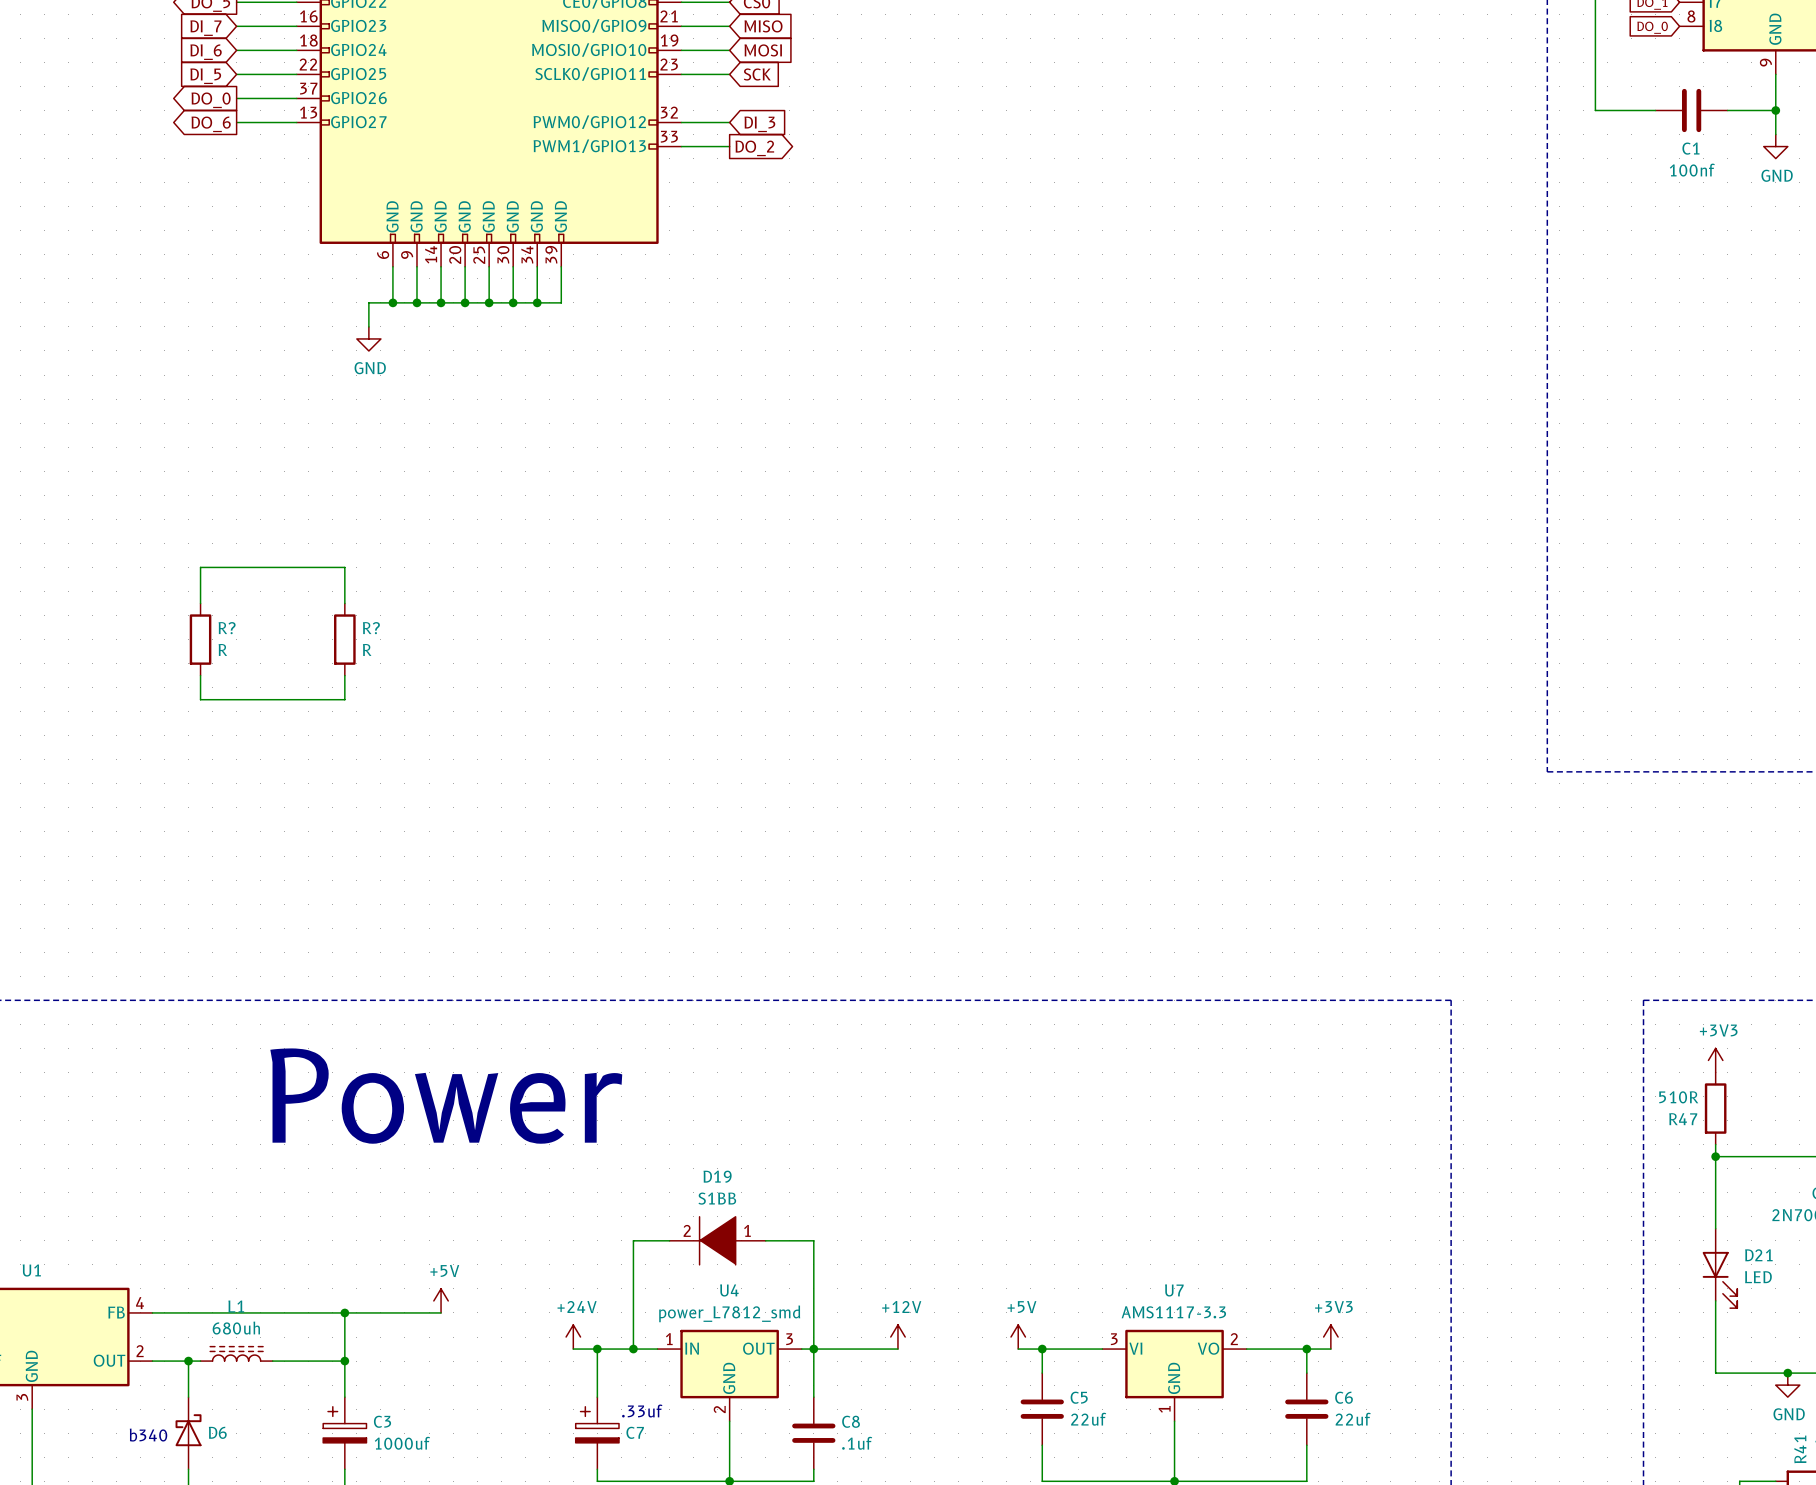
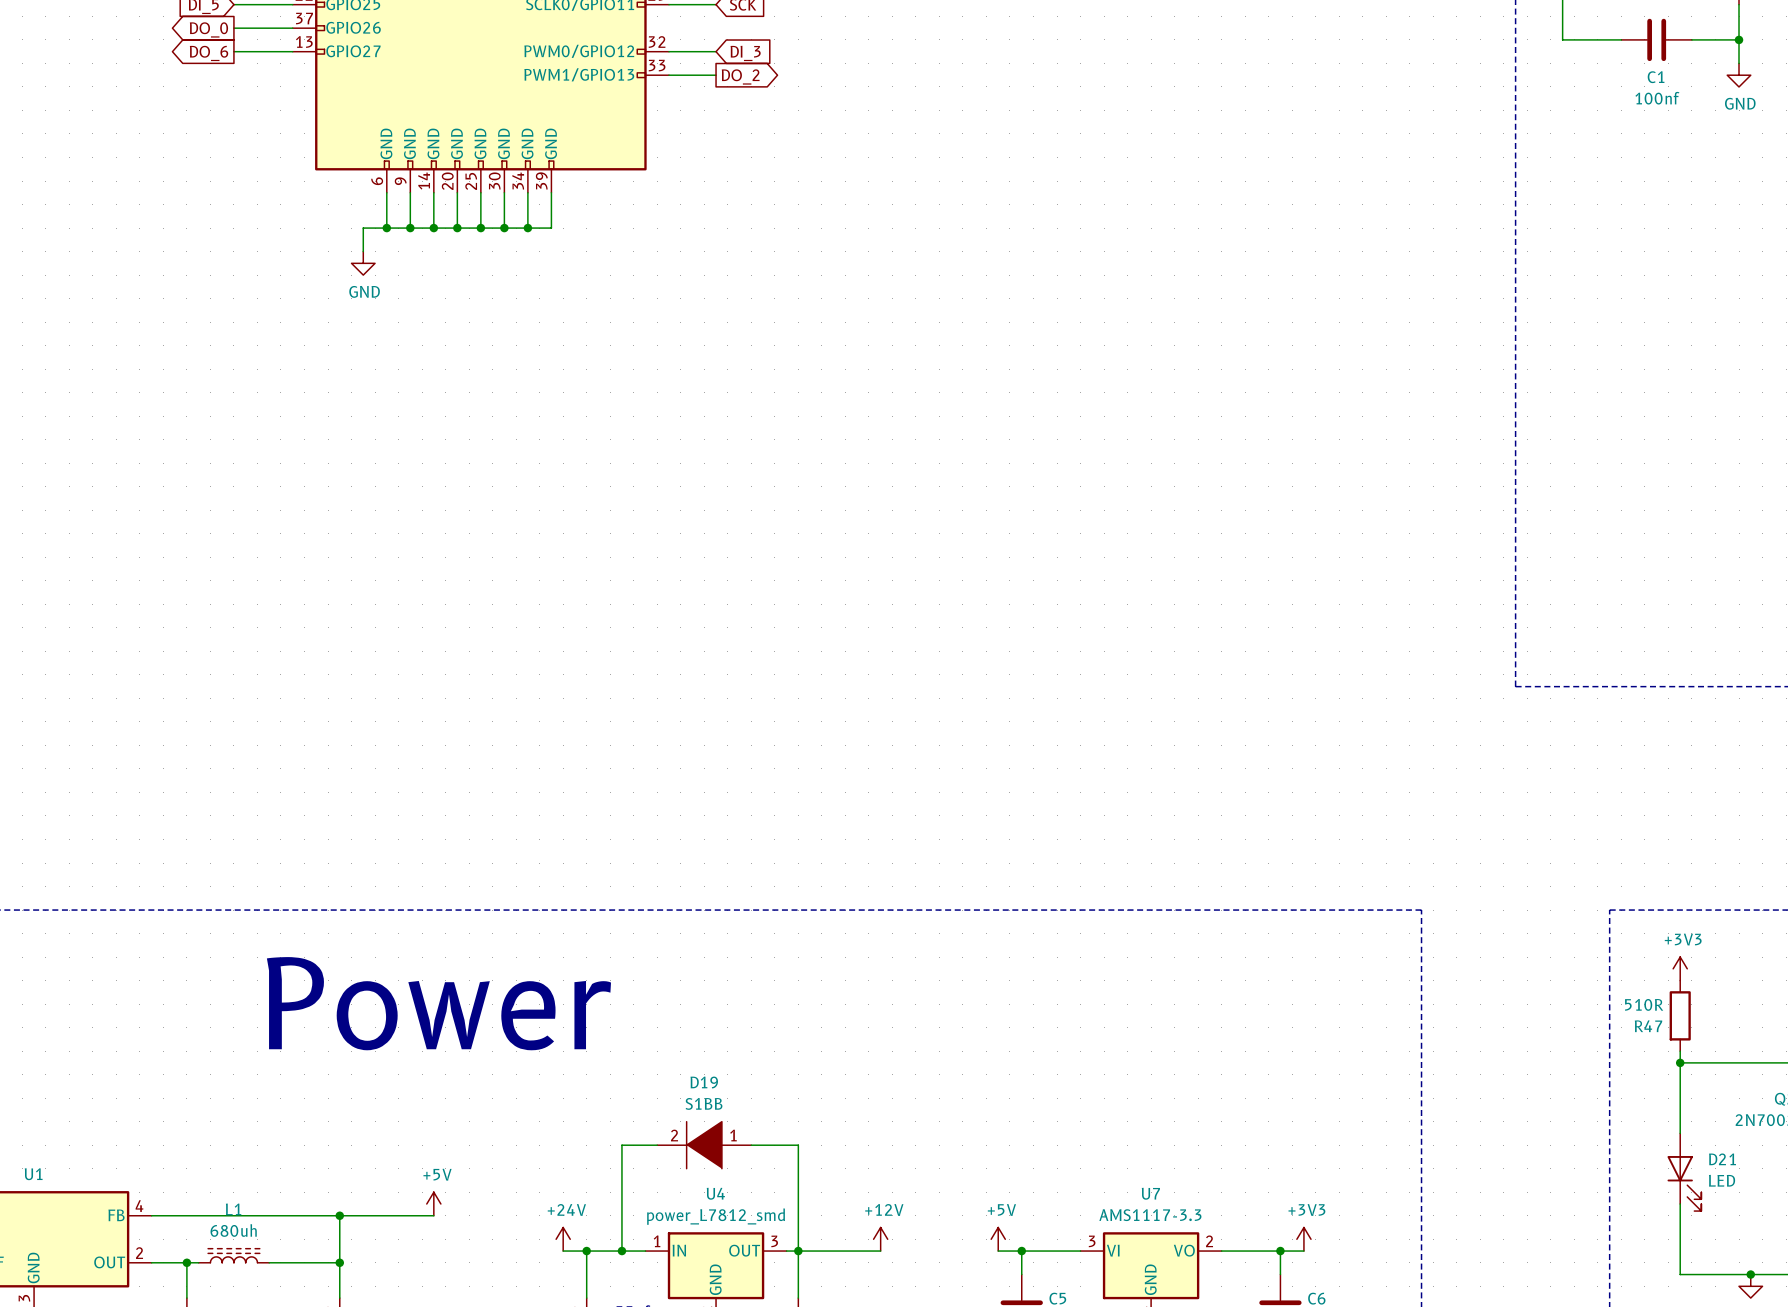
wire: (200, 603) (200, 567) (344, 567) (344, 603) -> none
R?: R (200, 639) -> none
R?: R (344, 639) -> none
wire: (200, 675) (200, 699) (344, 699) (344, 675) -> none

